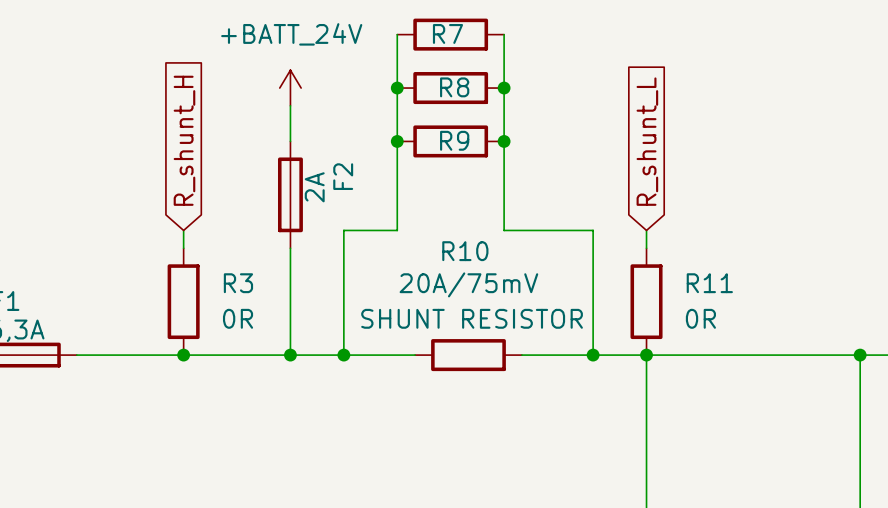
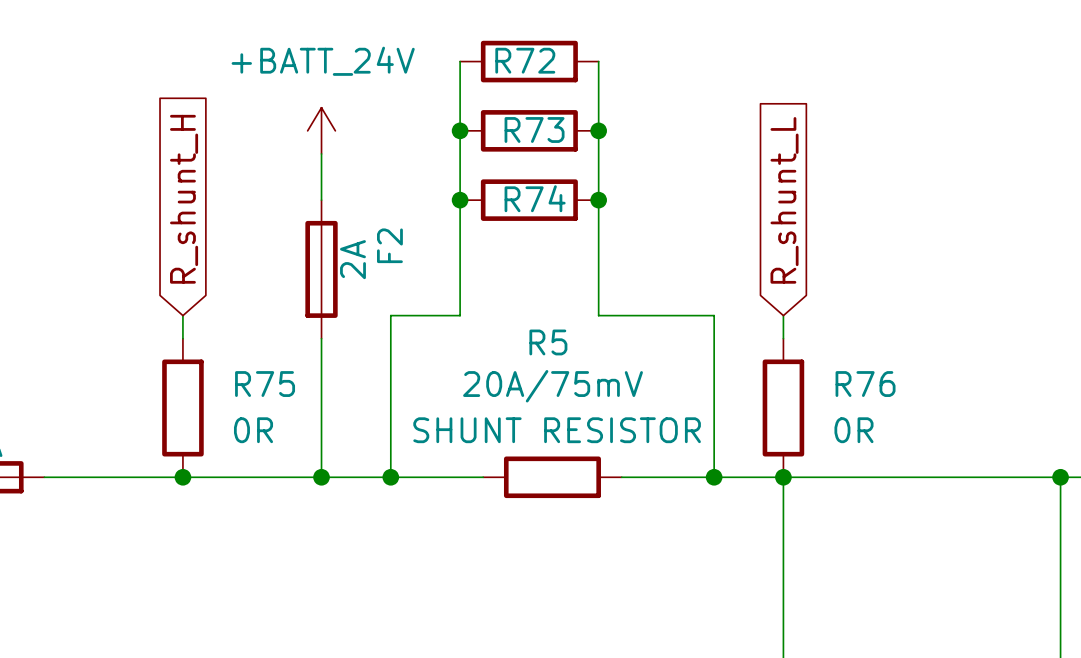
R7 name: R7 (447, 33) -> R72 (525, 60)
R8 name: R8 (454, 87) -> R73 (534, 129)
R9 name: R9 (454, 140) -> R74 (535, 198)
R10 name: R10 (465, 251) -> R5 (548, 342)
R3 name: R3 (238, 283) -> R75 (265, 384)
R11 name: R11 (709, 283) -> R76 (865, 384)

